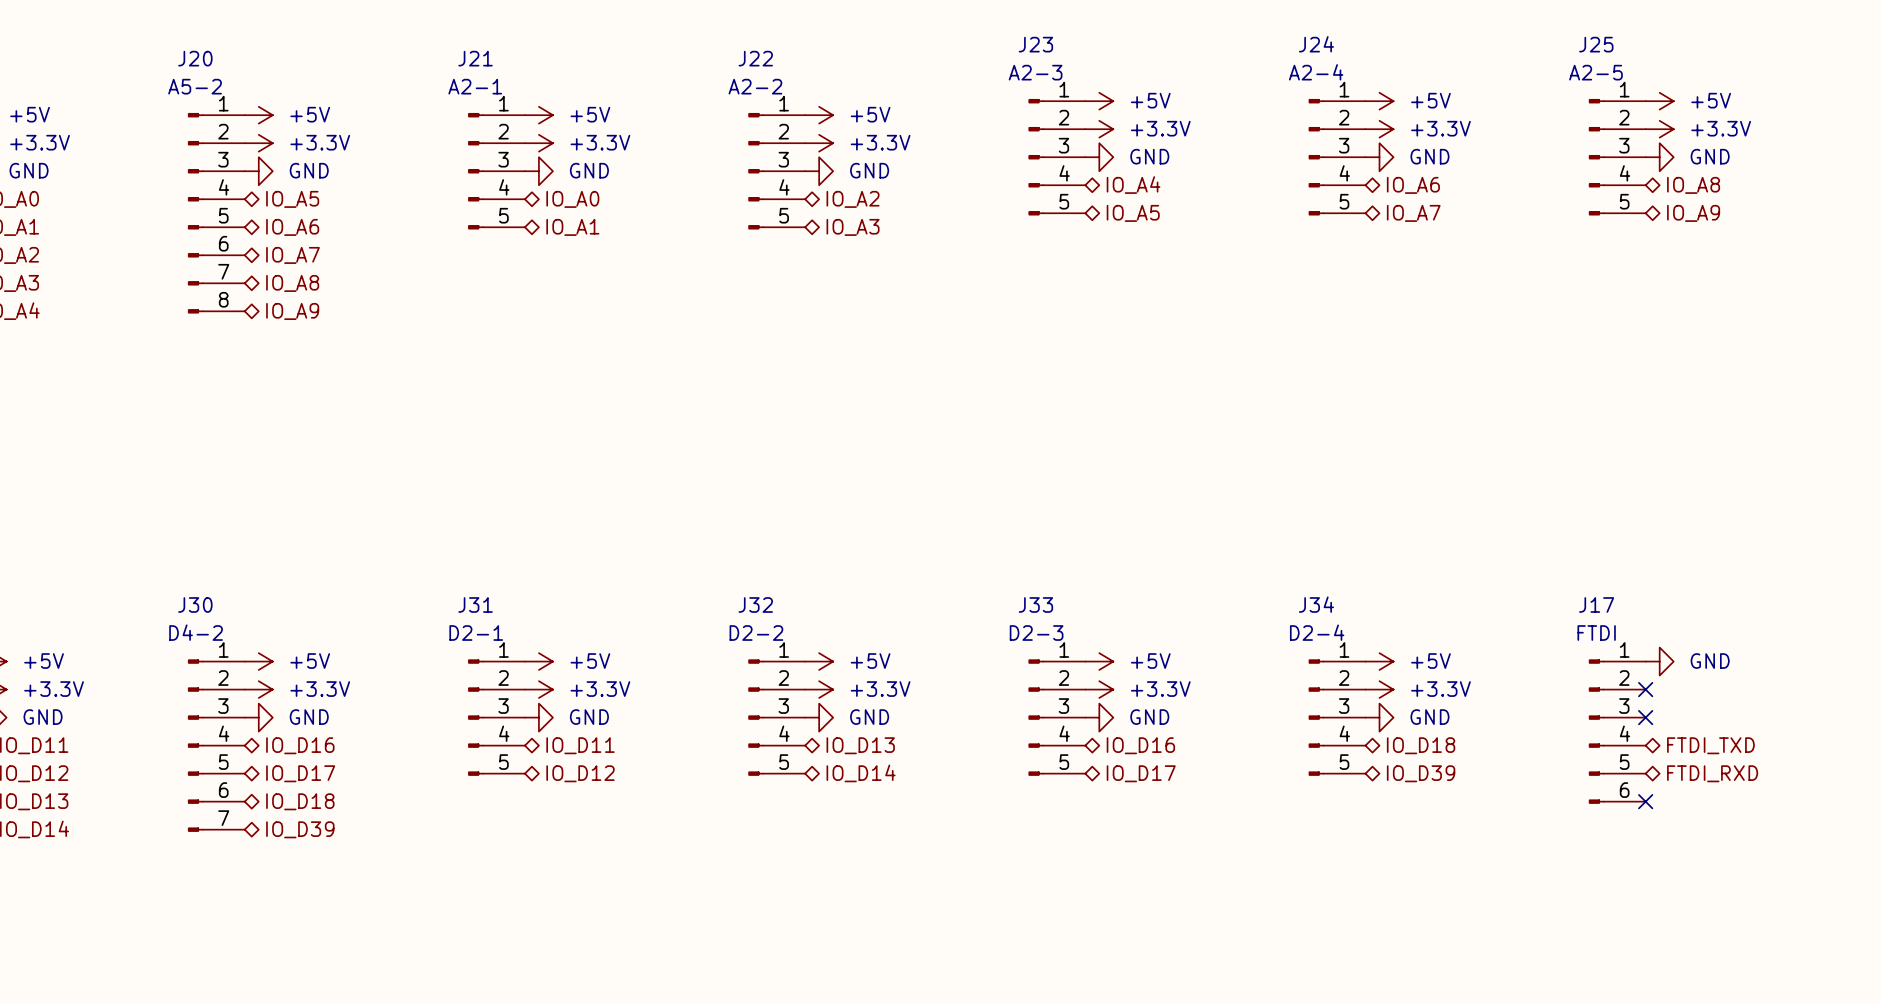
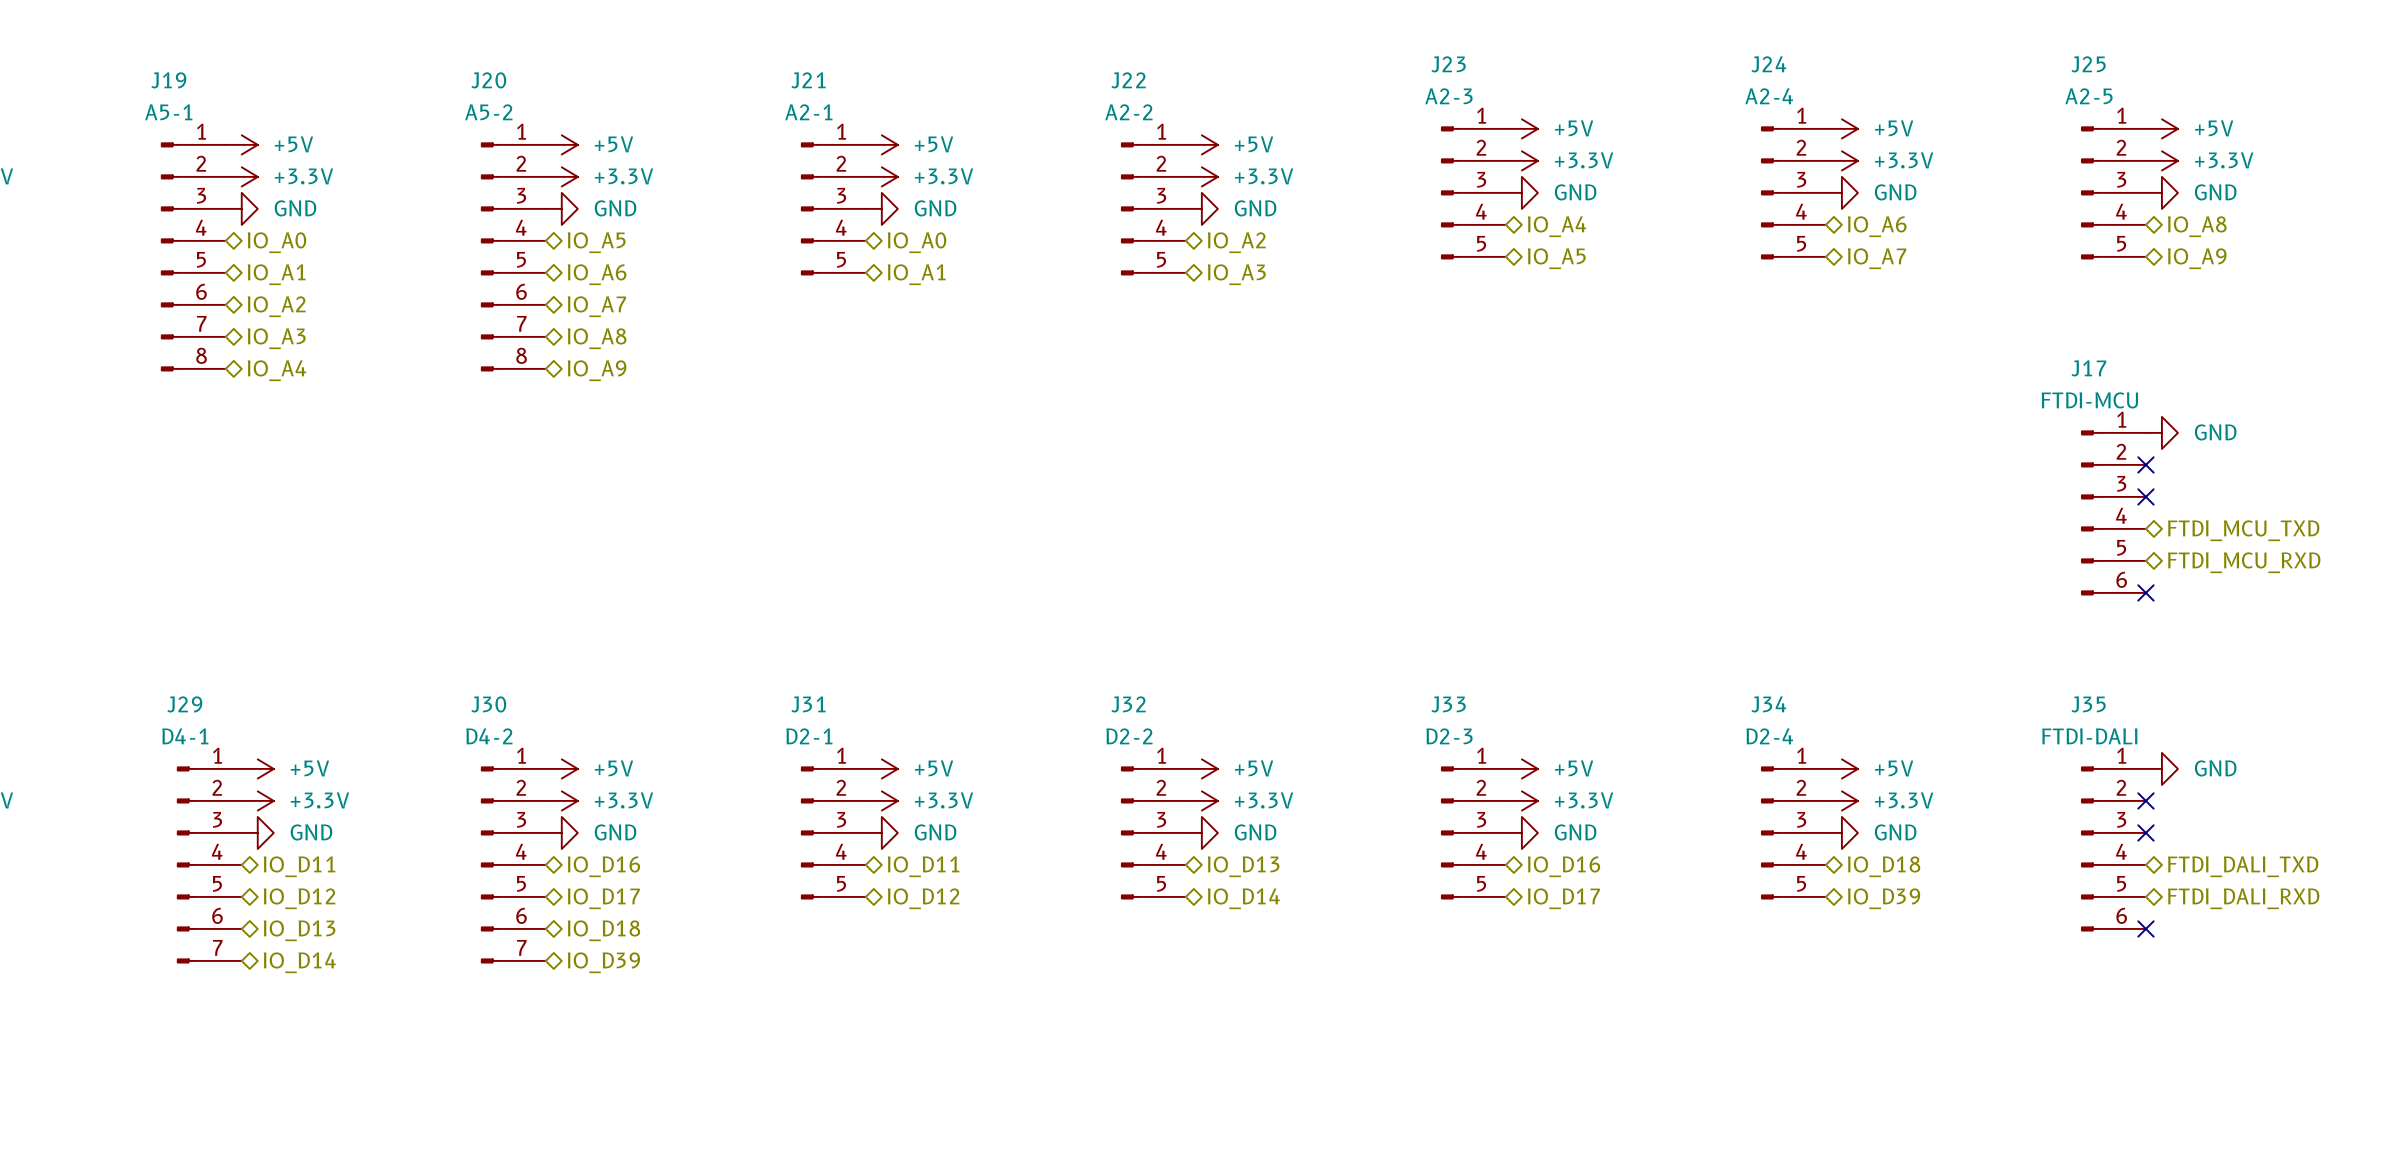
power symbol: none -> GND (2161, 432)
no-connect mark: none -> (2145, 464)
no-connect mark: none -> (2145, 496)
J17: none -> FTDI-MCU (2113, 512)
hierarchical label: none -> FTDI_MCU_TXD (2243, 530)
hierarchical label: none -> FTDI_MCU_RXD (2244, 562)
no-connect mark: none -> (2145, 592)
J17 name: J17 (1596, 604) -> J35 (2088, 704)
J17 value: FTDI (1596, 633) -> FTDI-DALI (2089, 736)
hierarchical label: FTDI_TXD (1710, 745) -> FTDI_DALI_TXD (2243, 866)
hierarchical label: FTDI_RXD (1712, 773) -> FTDI_DALI_RXD (2243, 898)

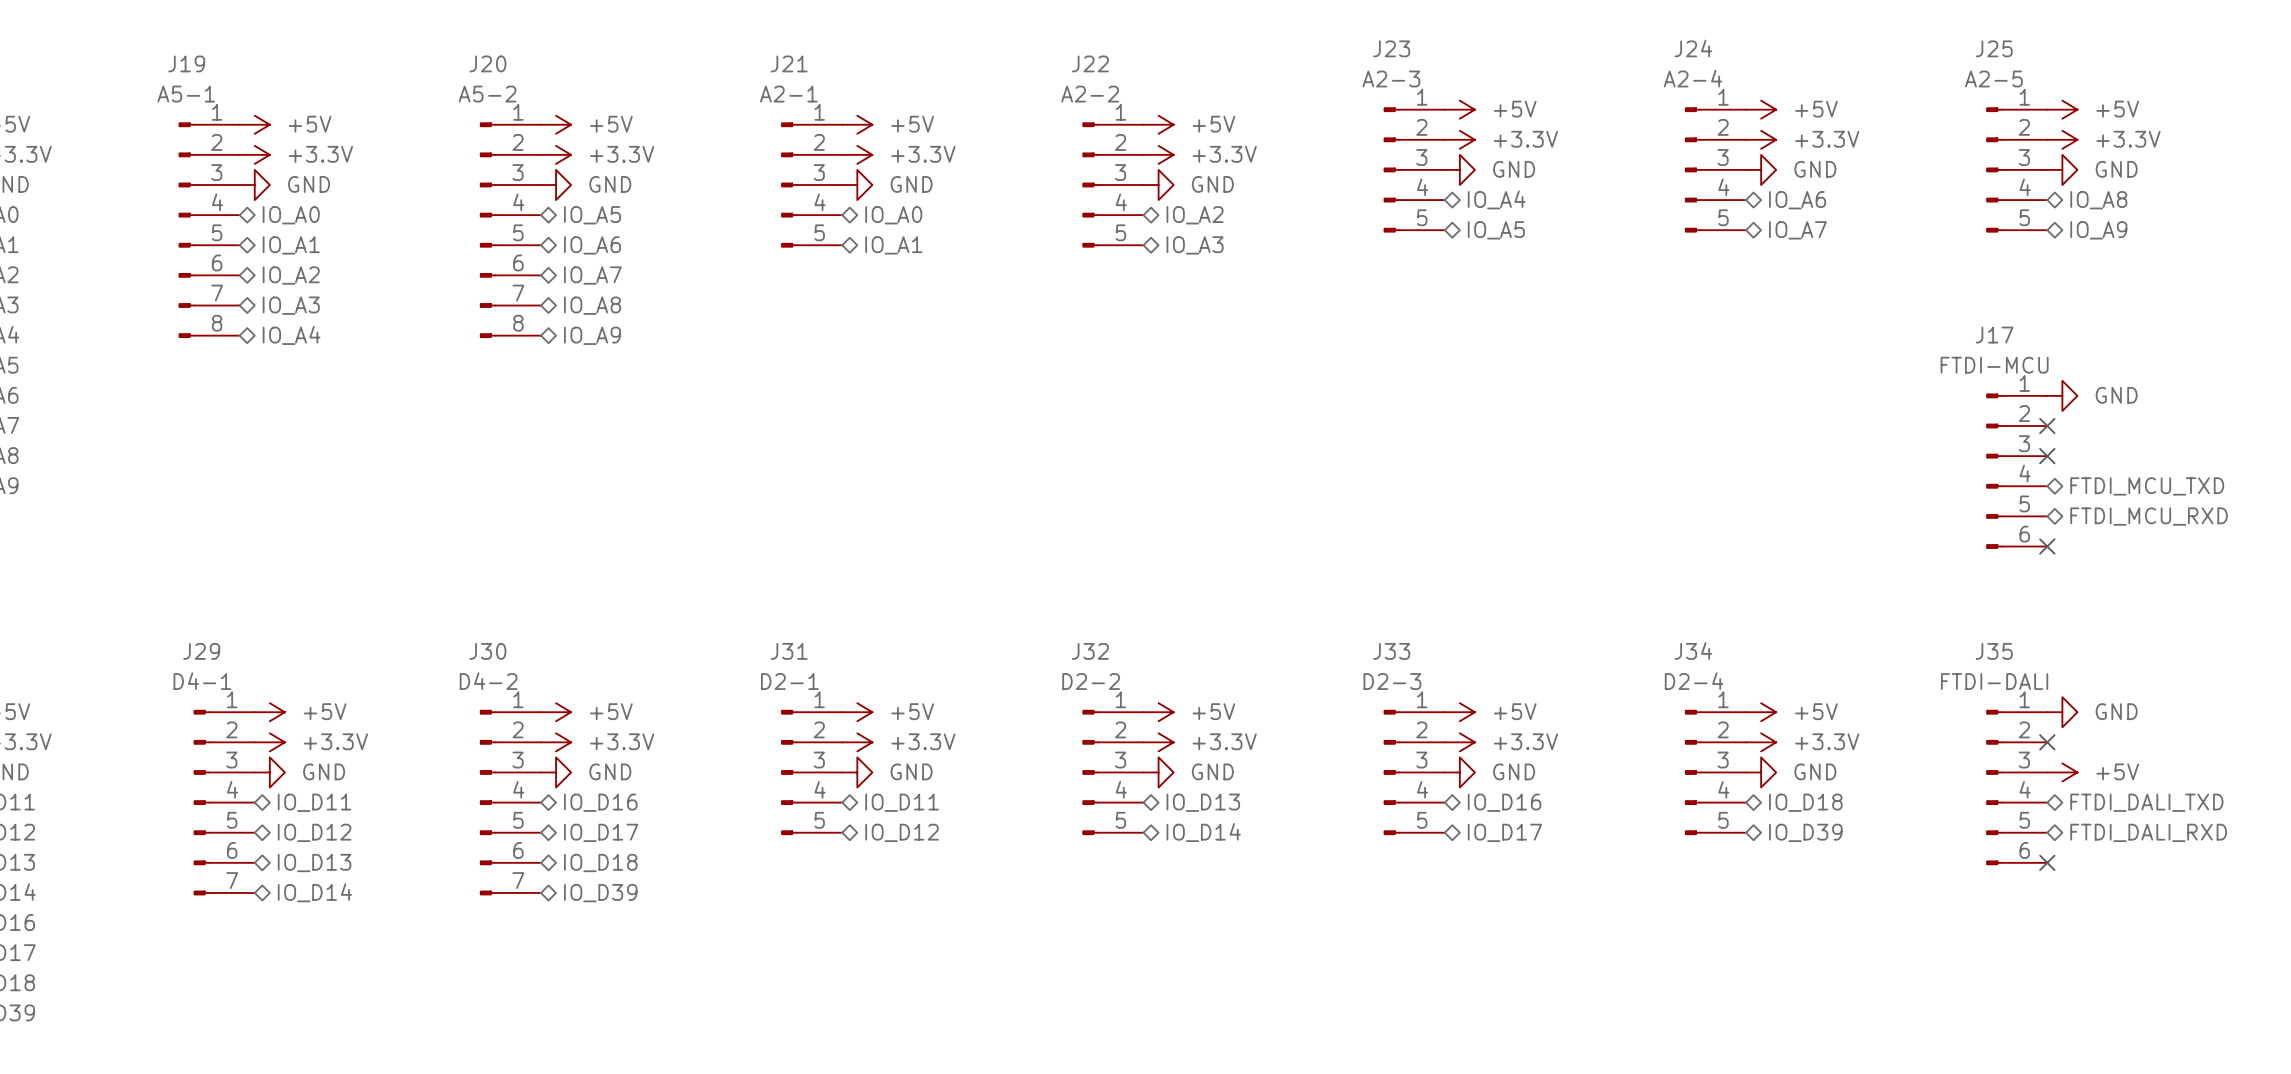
no-connect mark: (2145, 832) -> none
power symbol: none -> +5V (2062, 772)

